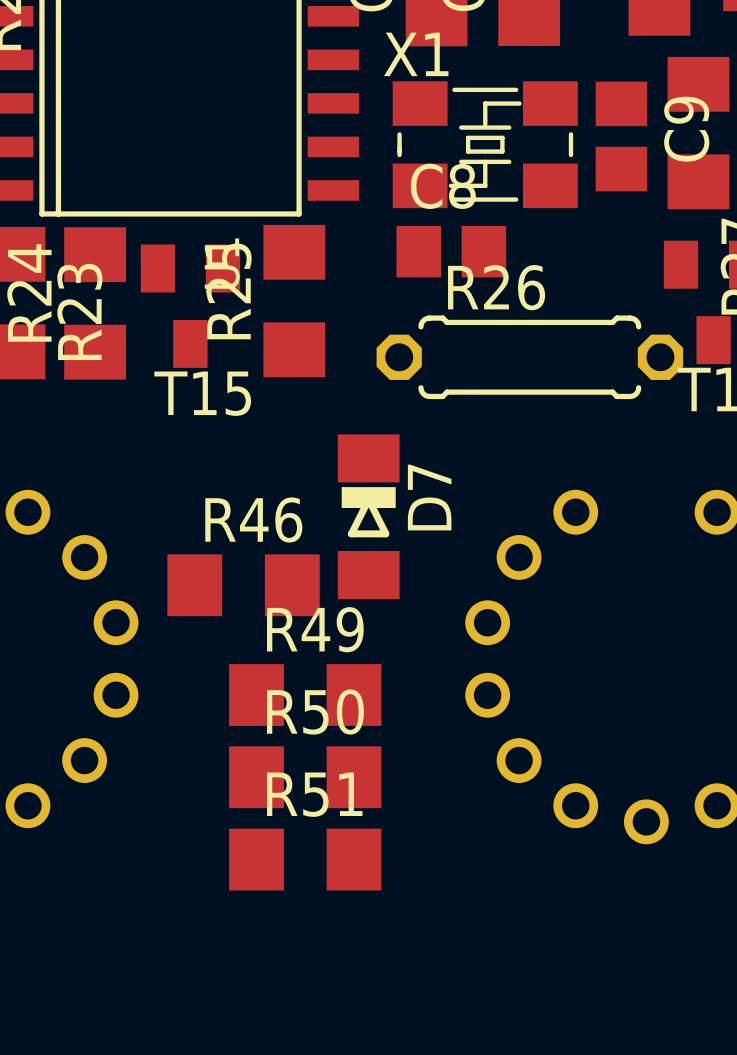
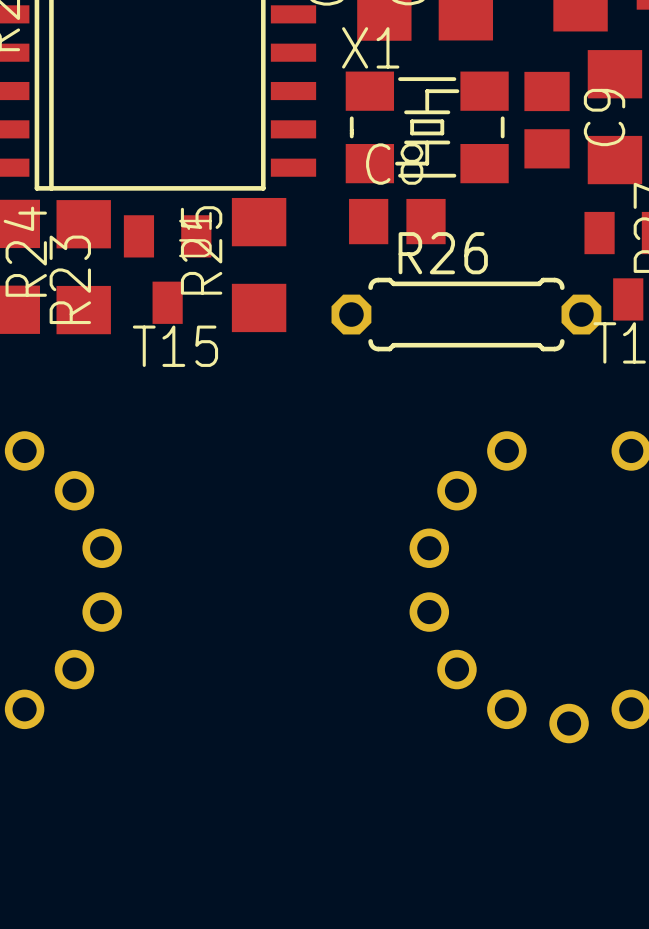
D7: (368, 516) -> none
R46: (243, 585) -> none
R49: (305, 694) -> none
R50: (305, 777) -> none
R51: (305, 859) -> none

